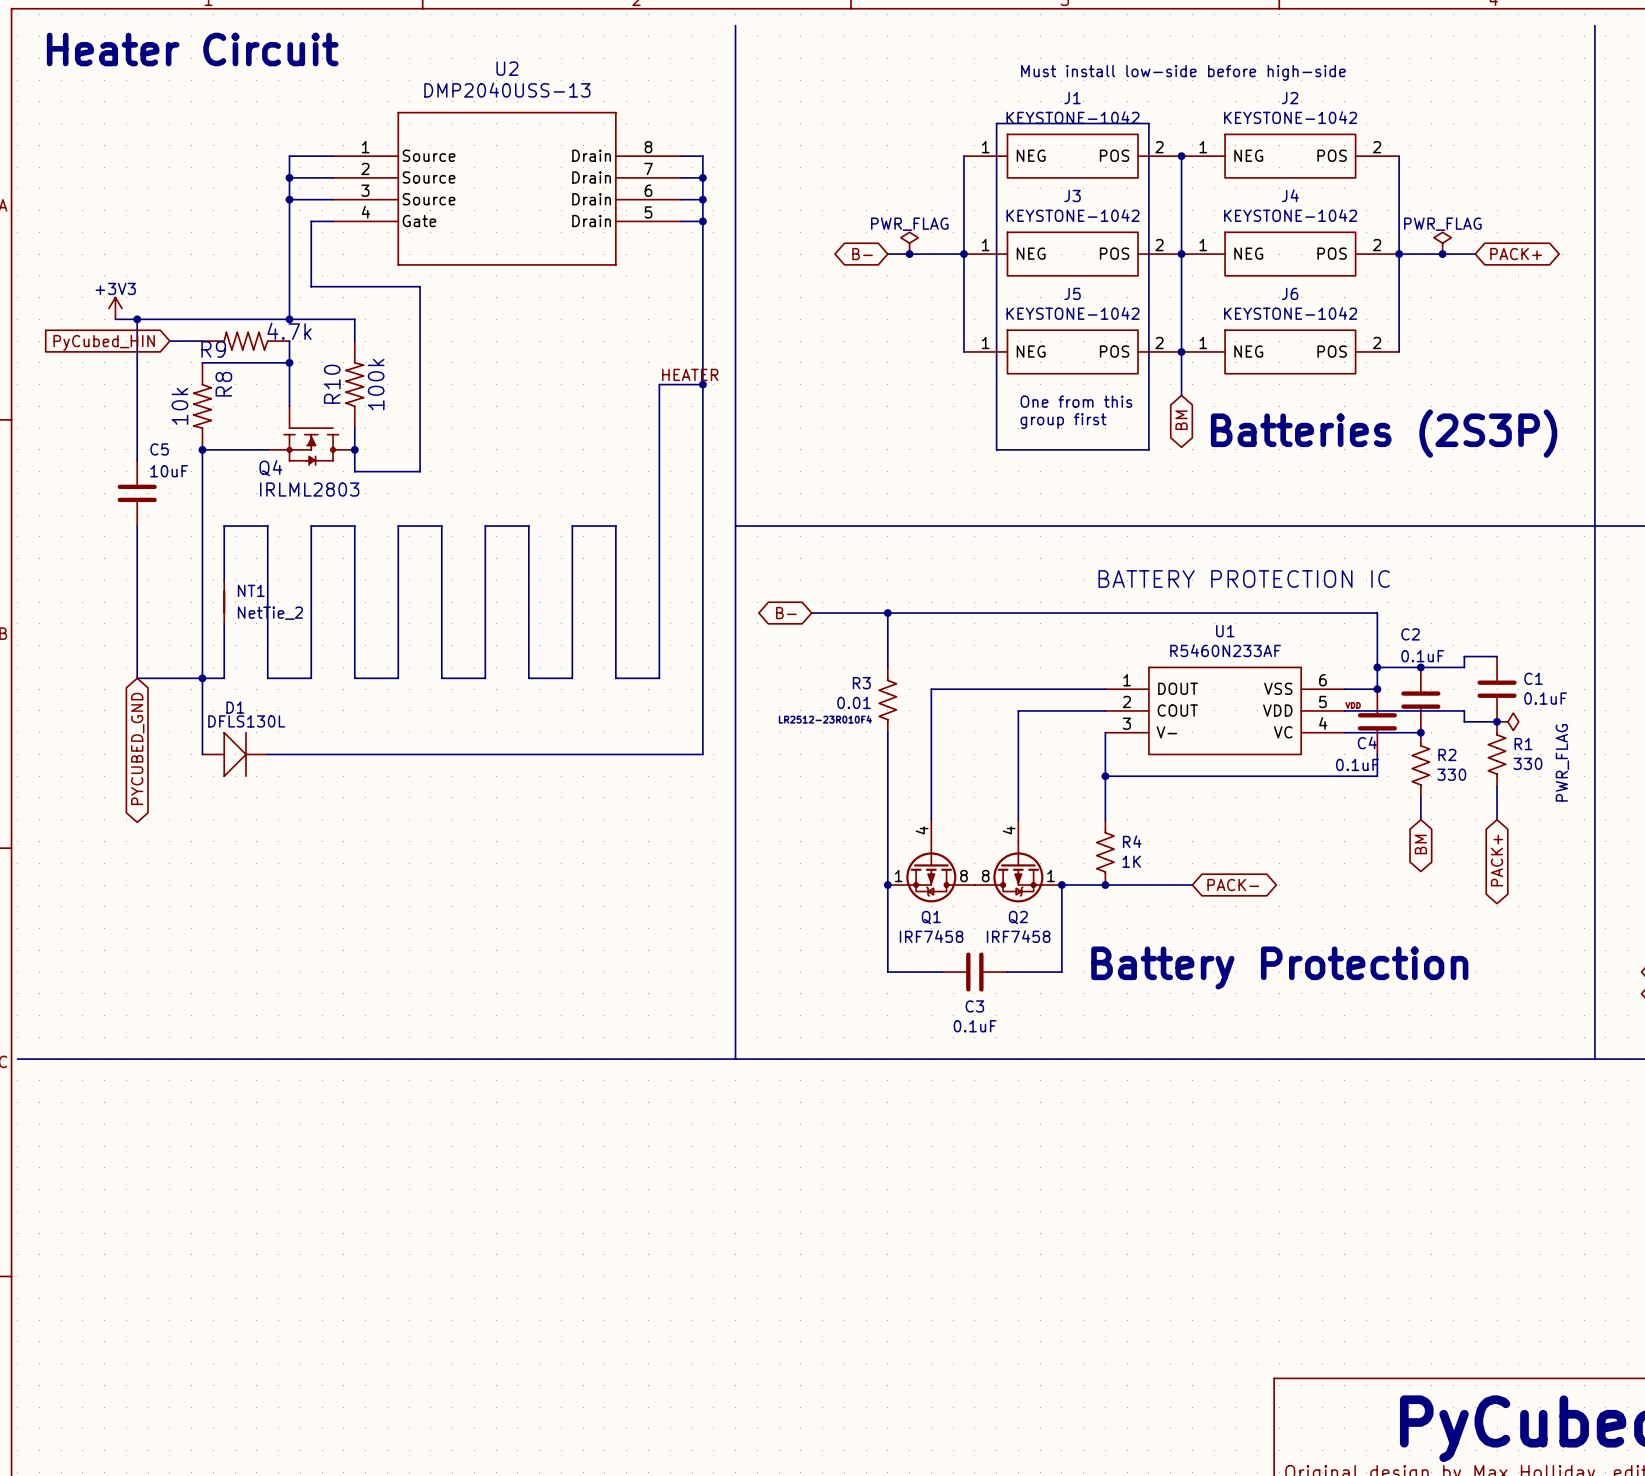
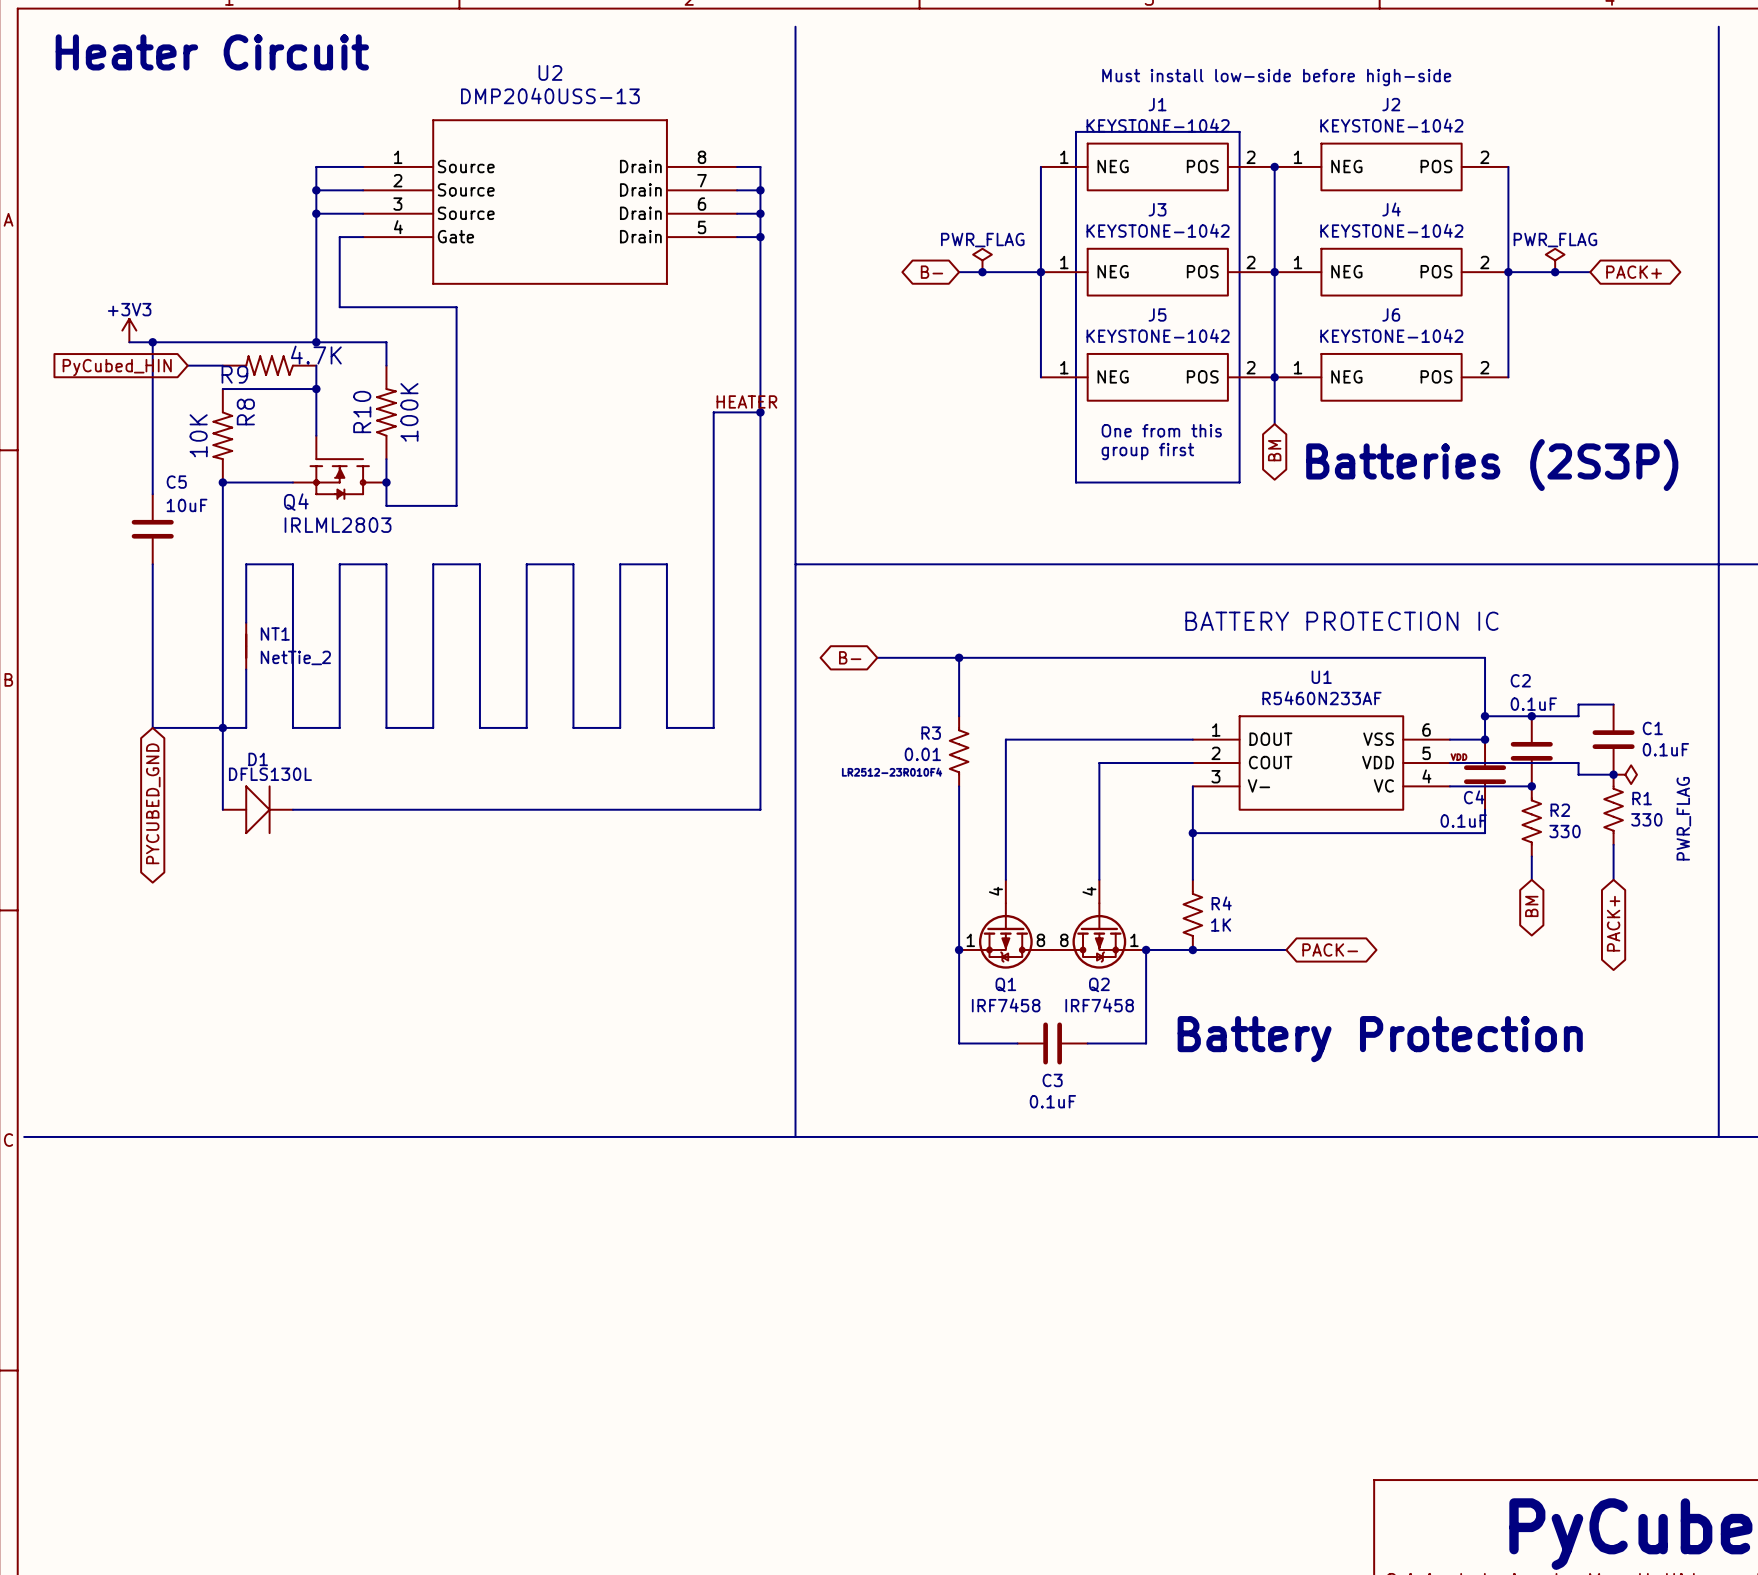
R9 value: 4.7k (289, 331) -> 4.7K (316, 355)
R10 value: 100k (376, 384) -> 100K (409, 412)
R8 value: 10k (179, 406) -> 10K (198, 435)

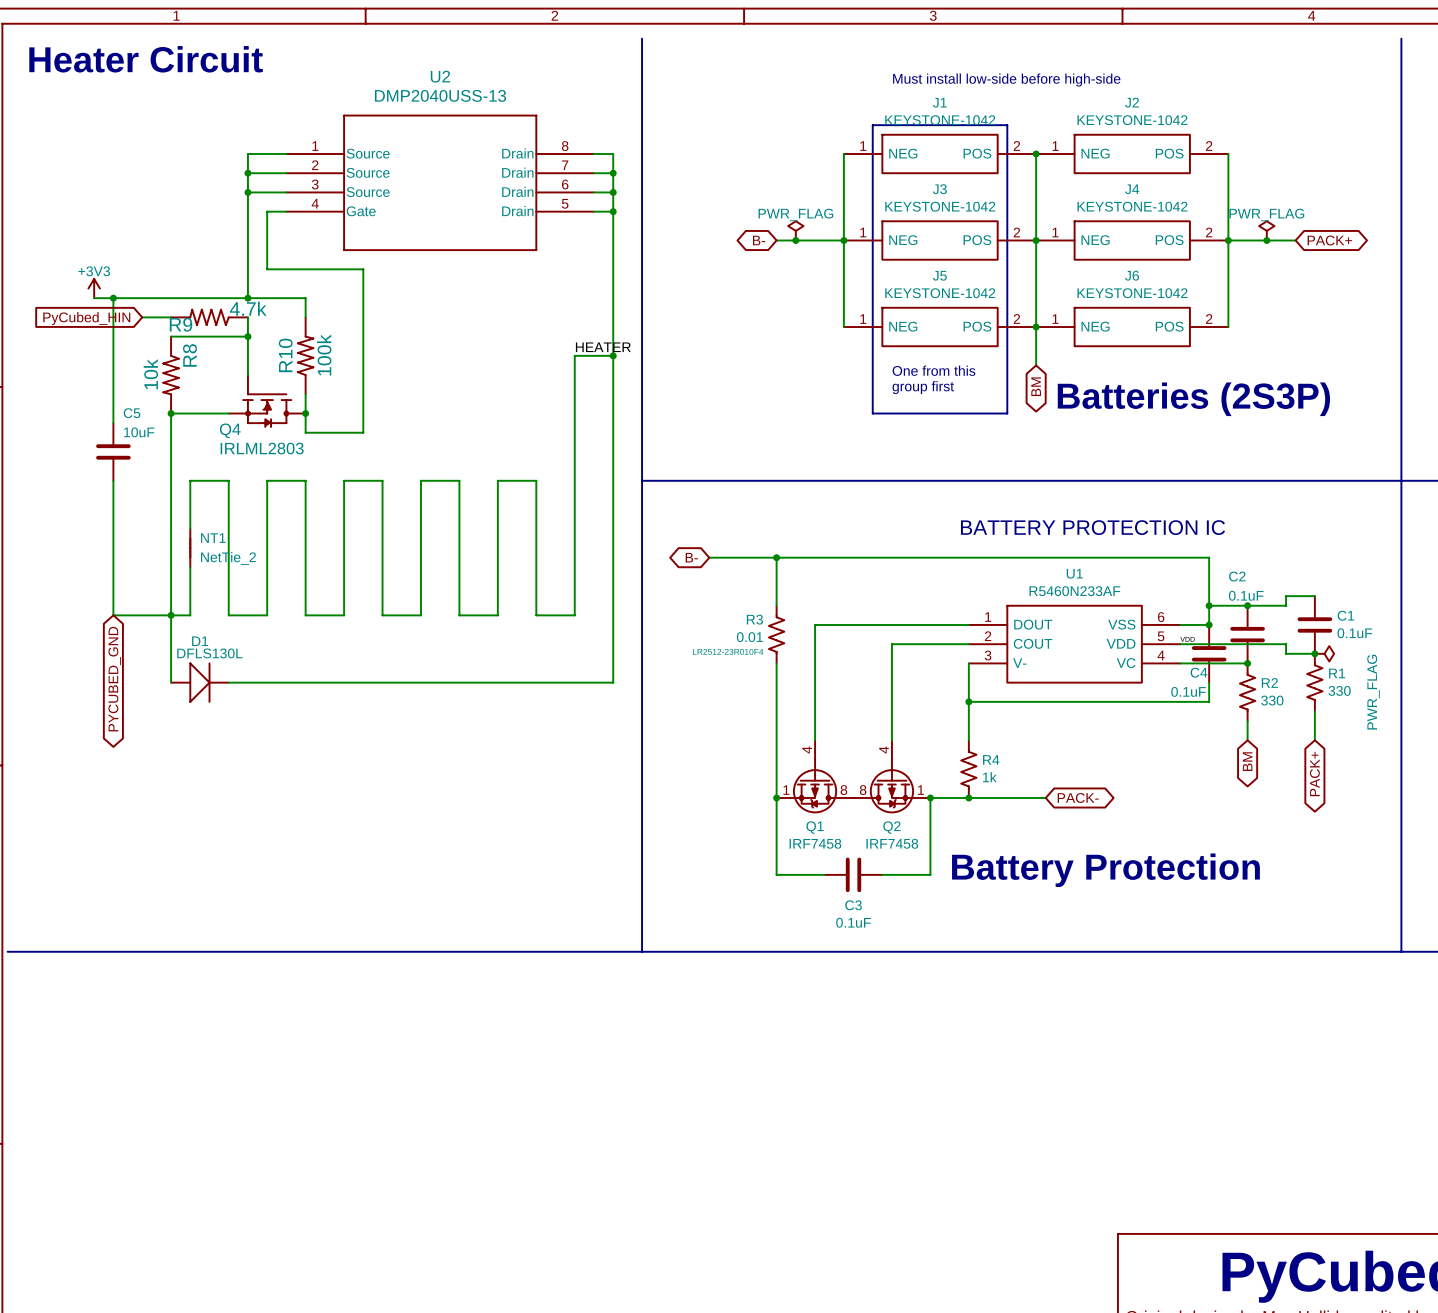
R9 value: 4.7K (316, 355) -> 4.7k (248, 308)
R10 value: 100K (409, 412) -> 100k (324, 355)
R8 value: 10K (198, 435) -> 10k (150, 374)
R4 value: 1K (1221, 925) -> 1k (989, 777)

